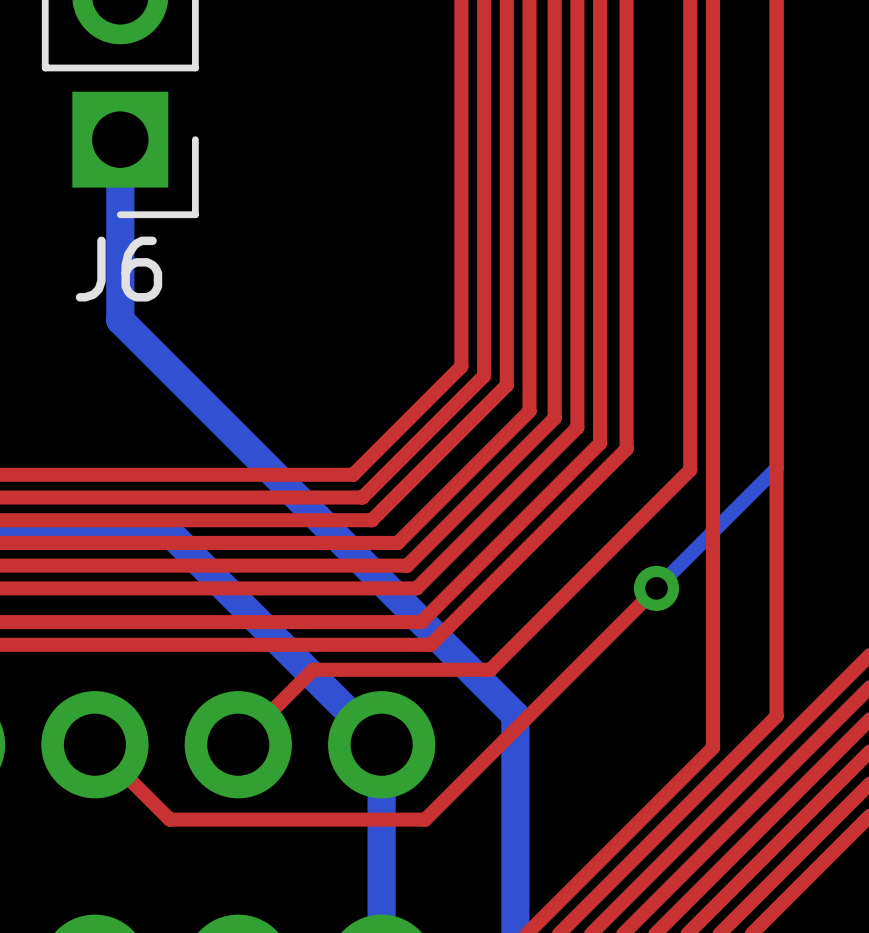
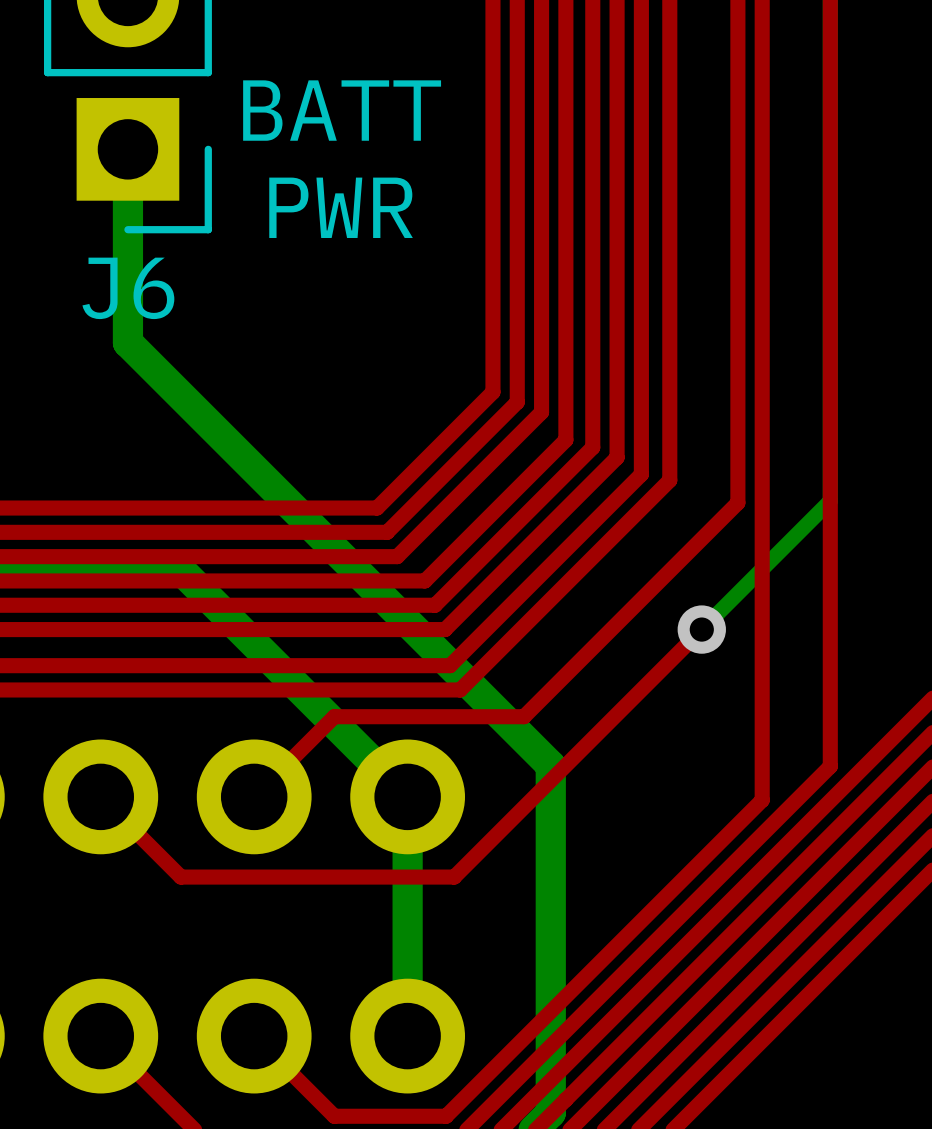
text: none -> BATT (342, 110)
text: none -> PWR (341, 207)

